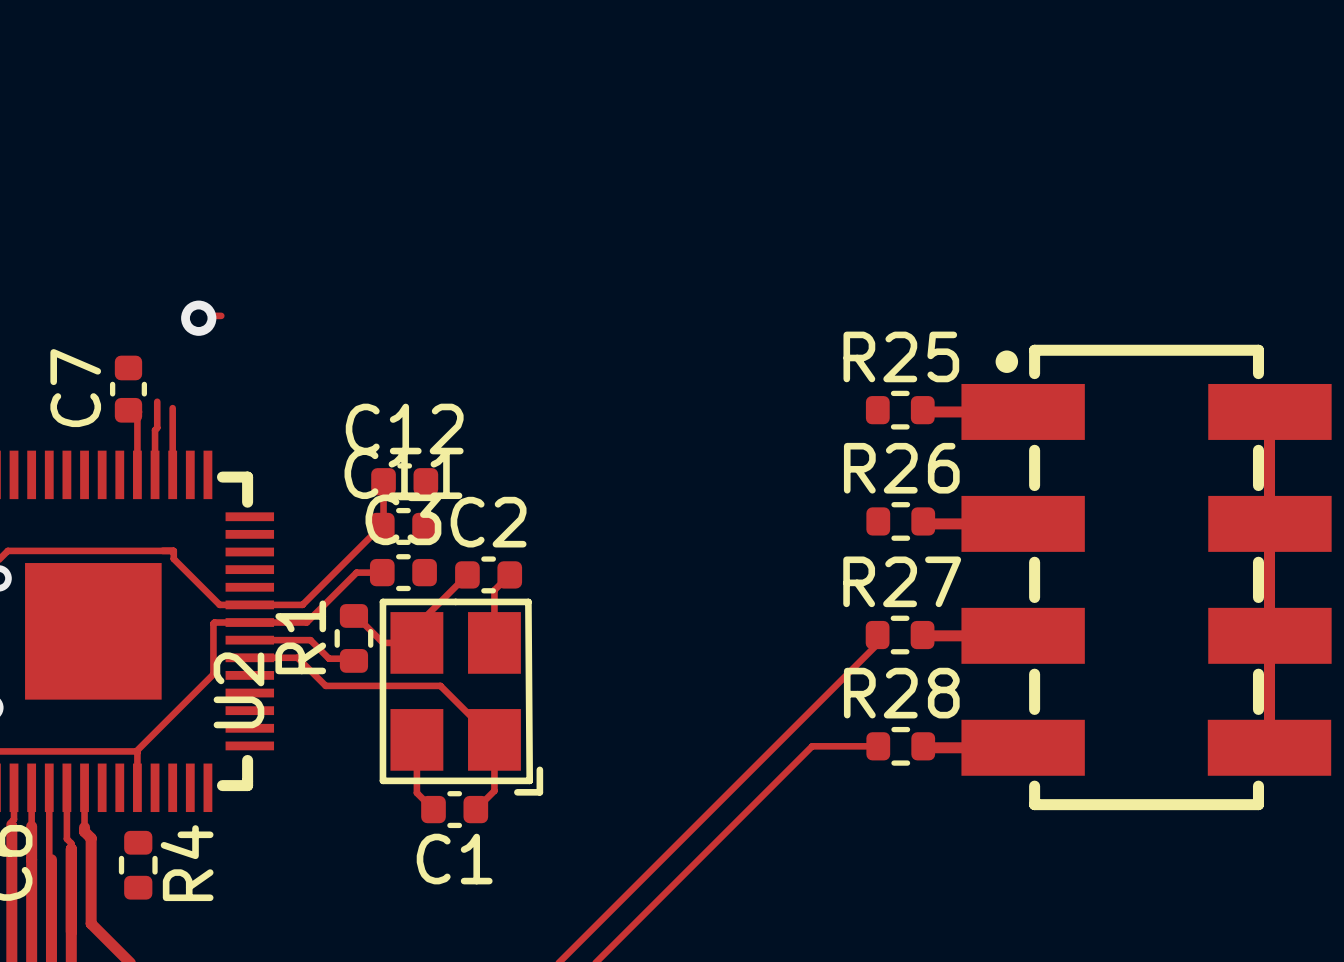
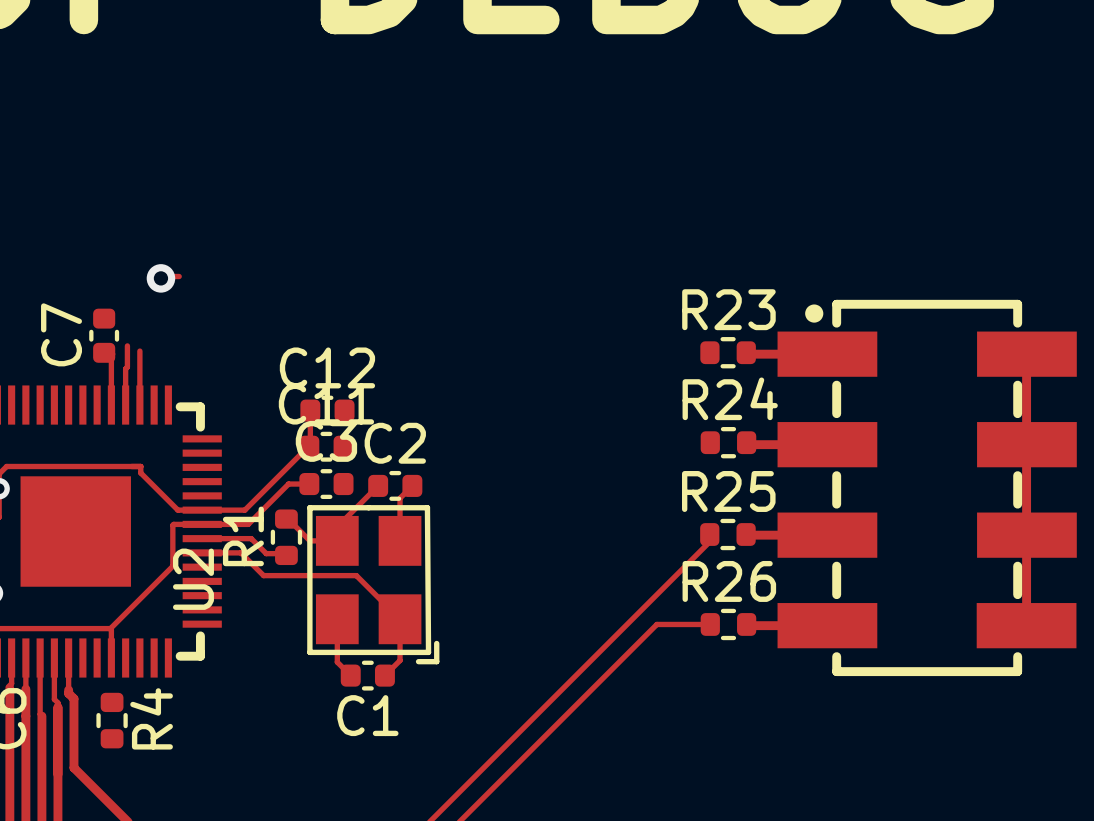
R25 name: R25 (901, 356) -> R23 (728, 309)
R26 name: R26 (901, 468) -> R24 (730, 398)
R27 name: R27 (902, 581) -> R25 (728, 491)
R28 name: R28 (901, 693) -> R26 (729, 581)

